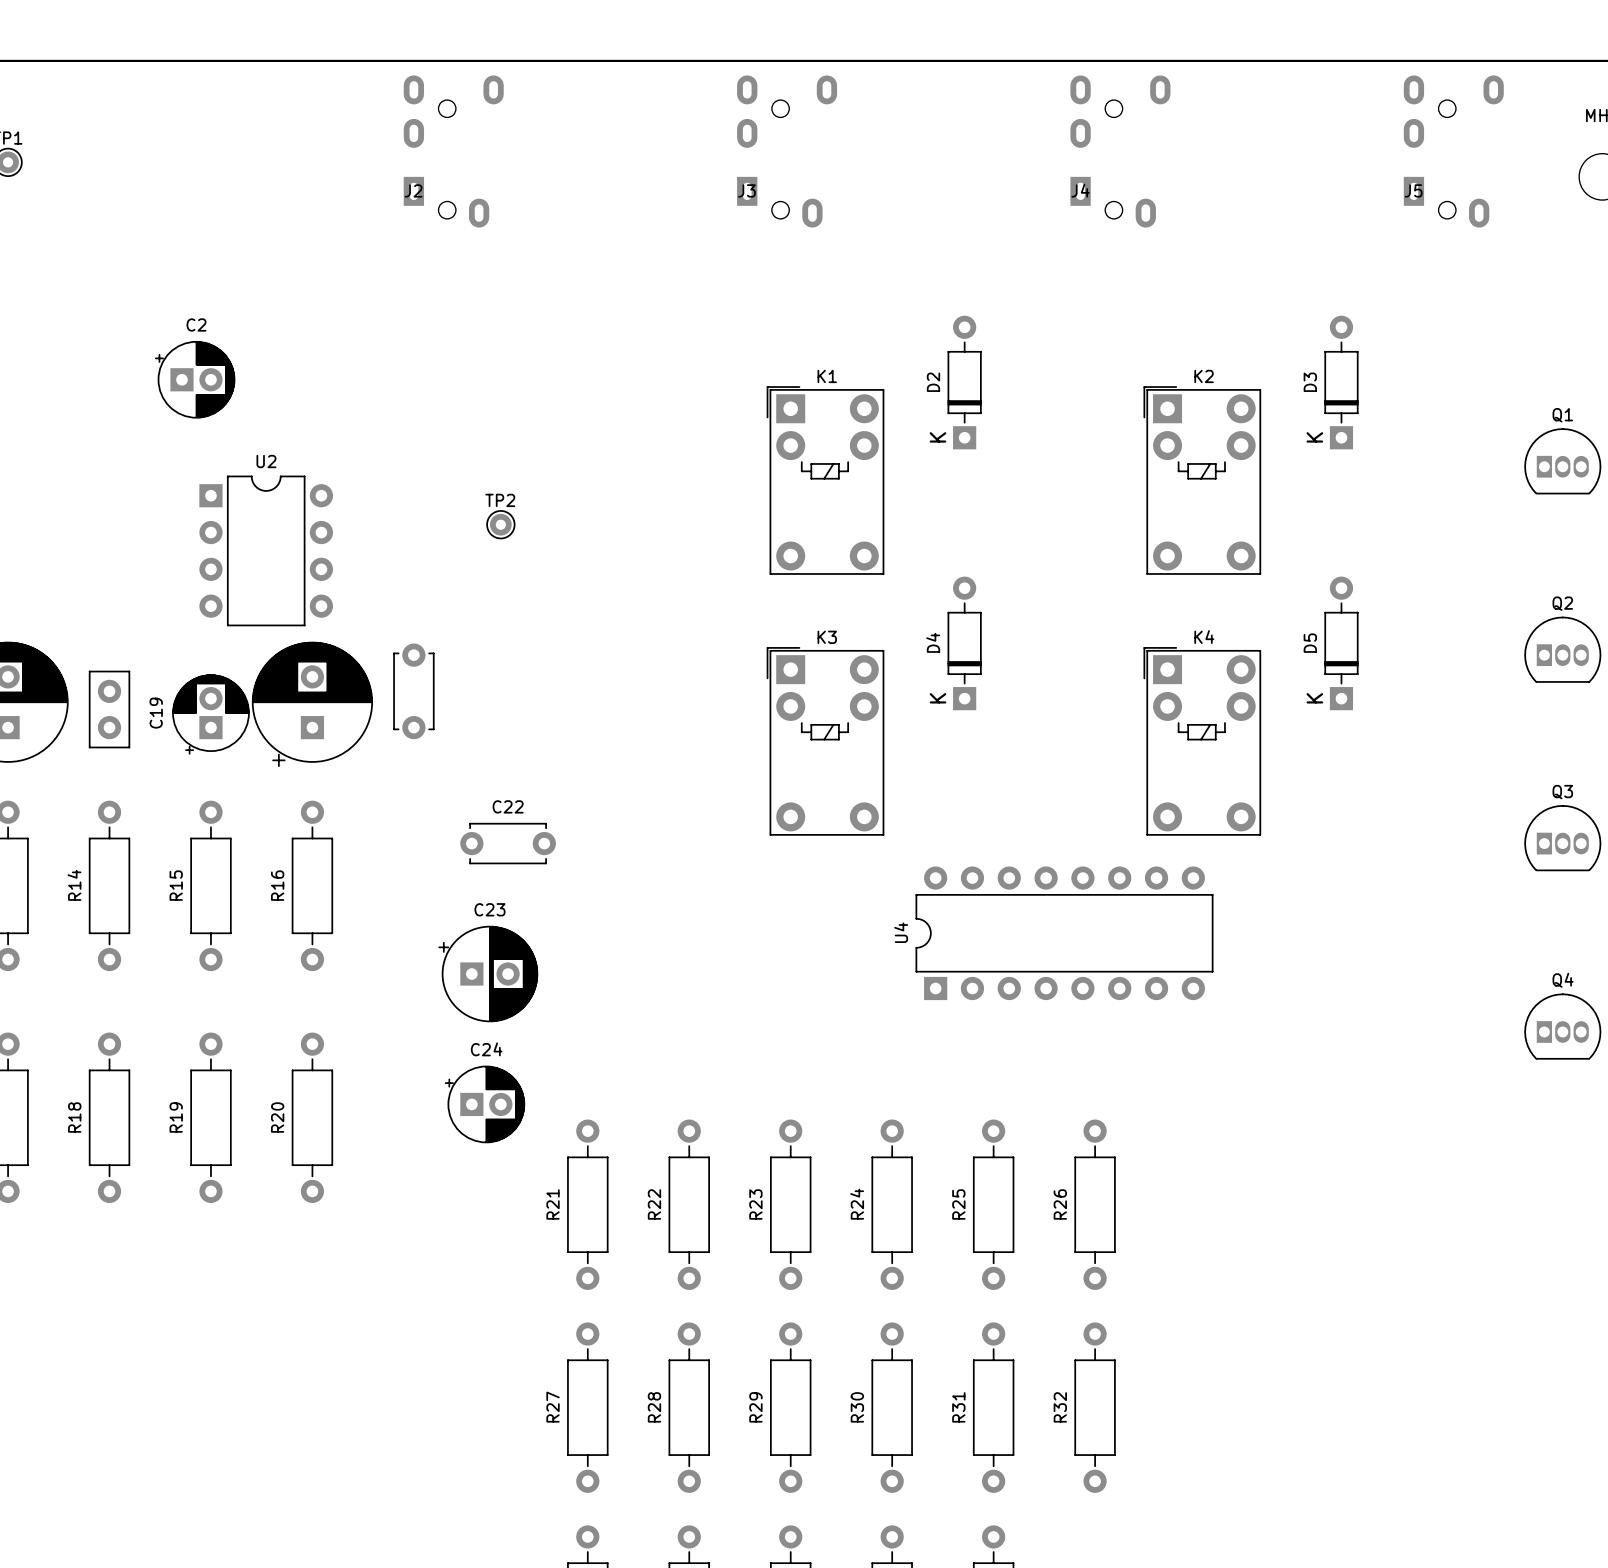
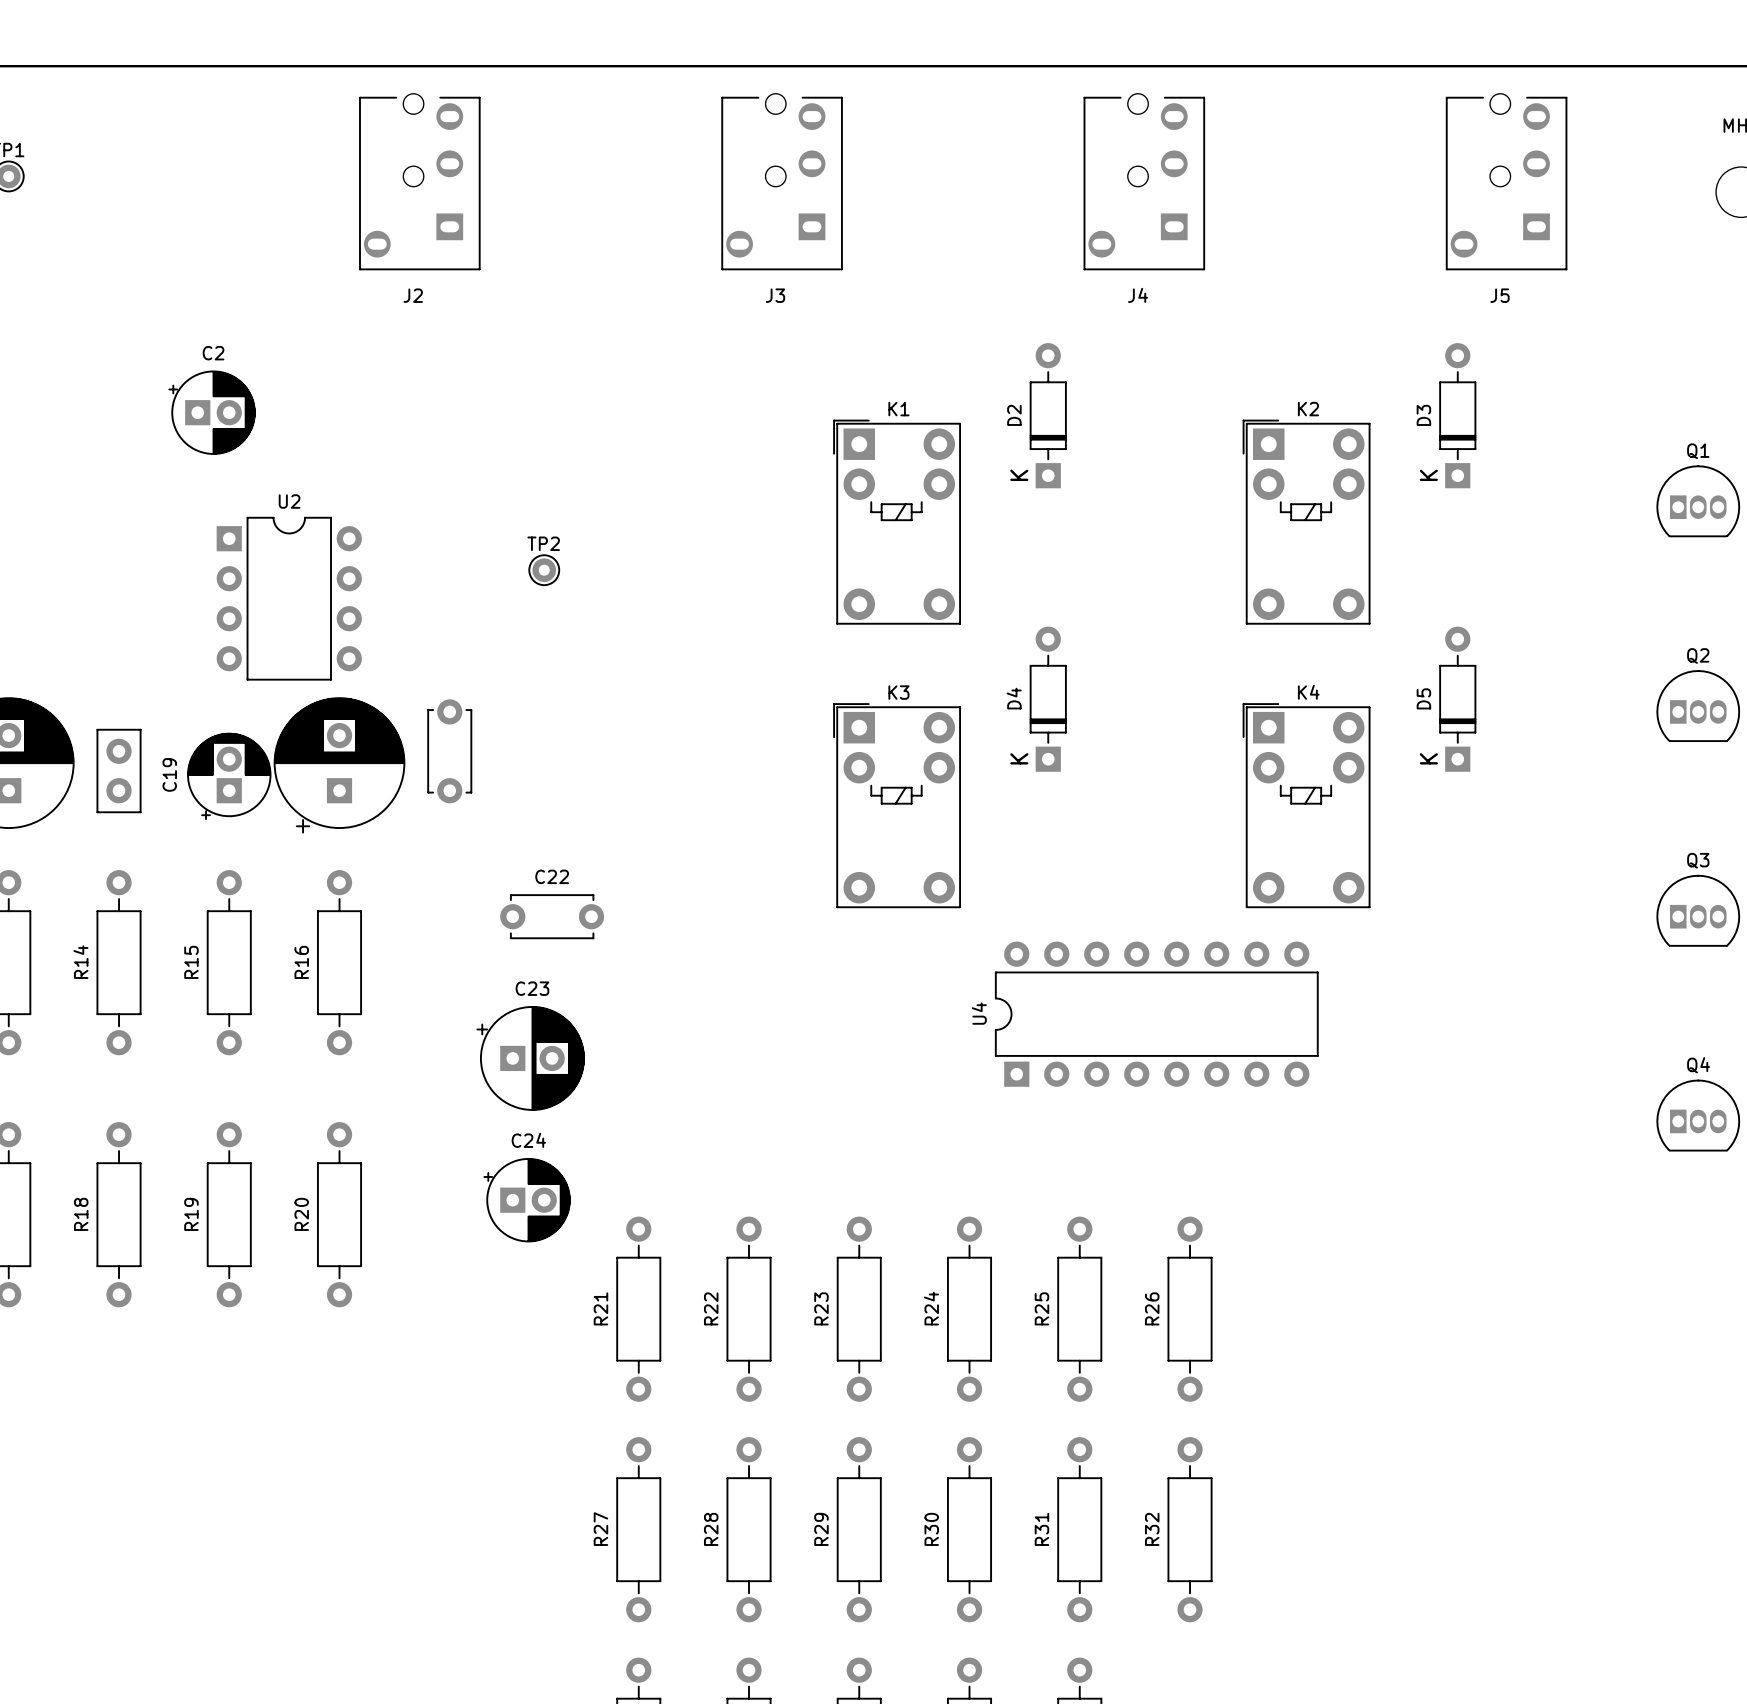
J2 footprint: [403, 75, 504, 228] -> [359, 93, 481, 271]
J3 footprint: [737, 75, 838, 228] -> [721, 93, 843, 271]
J4 footprint: [1070, 75, 1171, 228] -> [1083, 93, 1206, 271]
J5 footprint: [1403, 75, 1504, 228] -> [1445, 93, 1568, 271]
J2 name position: J2 (413, 190) -> J2 (413, 295)
J3 name position: J3 (746, 190) -> J3 (775, 295)
J4 name position: J4 (1080, 190) -> J4 (1138, 295)
J5 name position: J5 (1413, 190) -> J5 (1499, 295)

